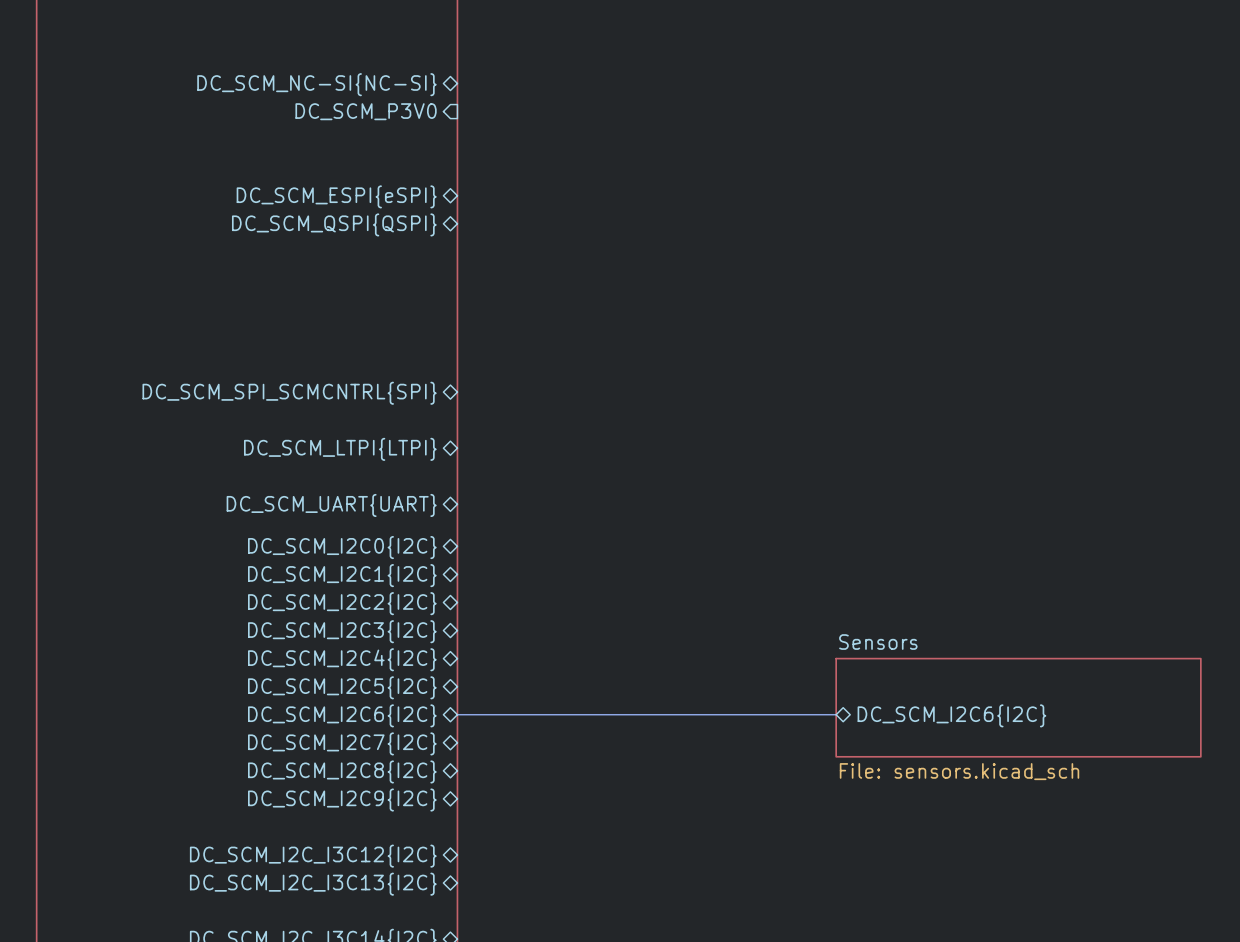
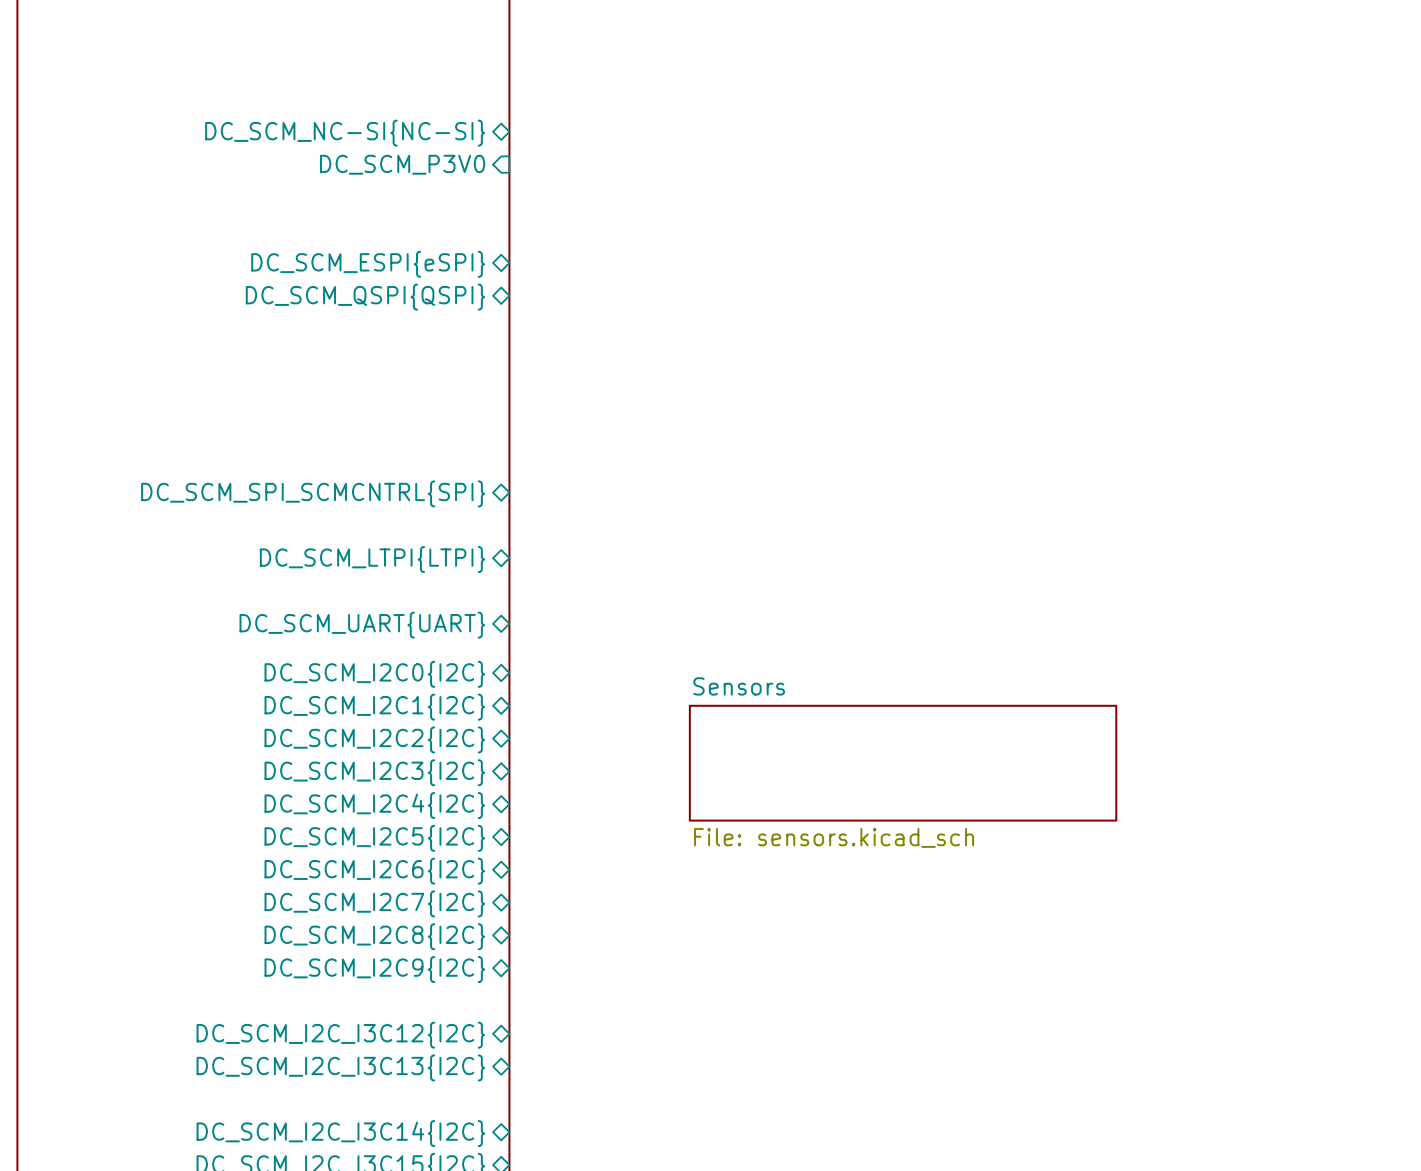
sheet Sensors position: (1018, 707) -> (903, 763)
bus: (457, 714) (836, 714) -> none
sheet pin: DC_SCM_I2C6{I2C} (951, 715) -> none

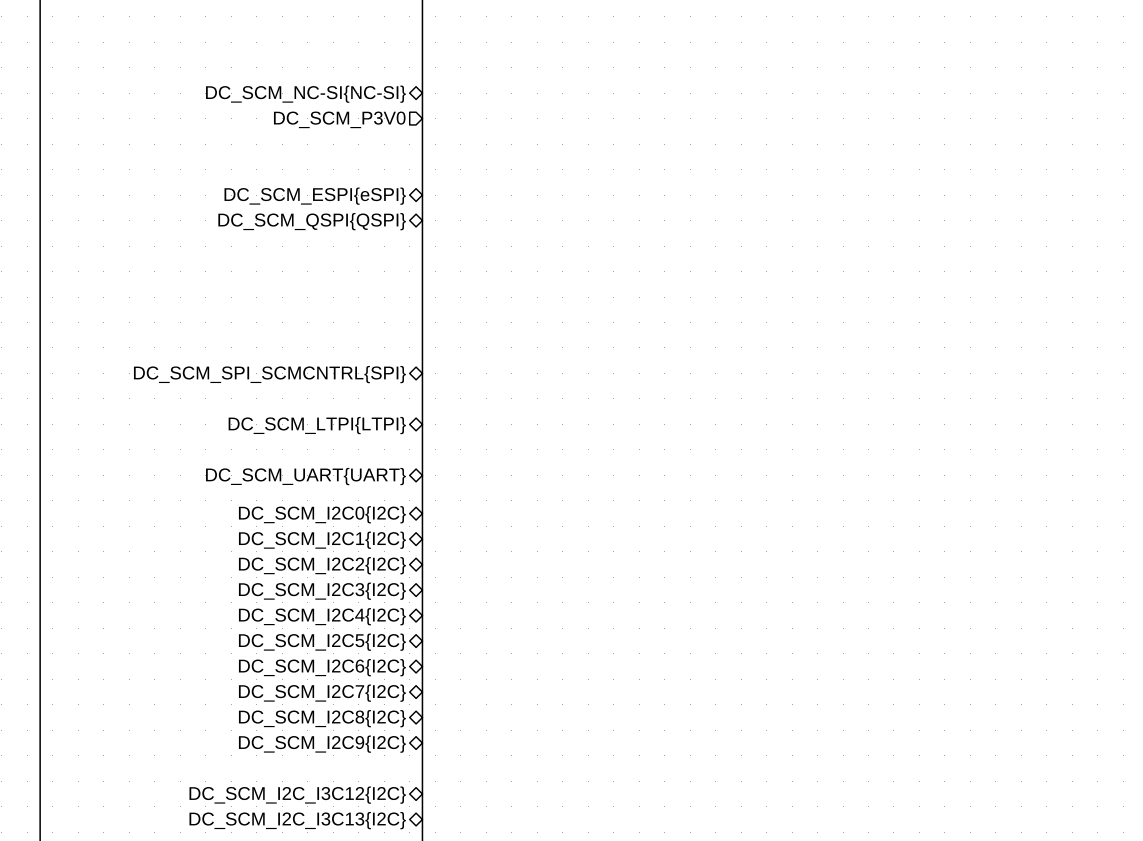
sheet pin shape: input (402, 164) -> output (339, 119)
sheet Sensors: File: sensors.kicad_sch (903, 763) -> none

